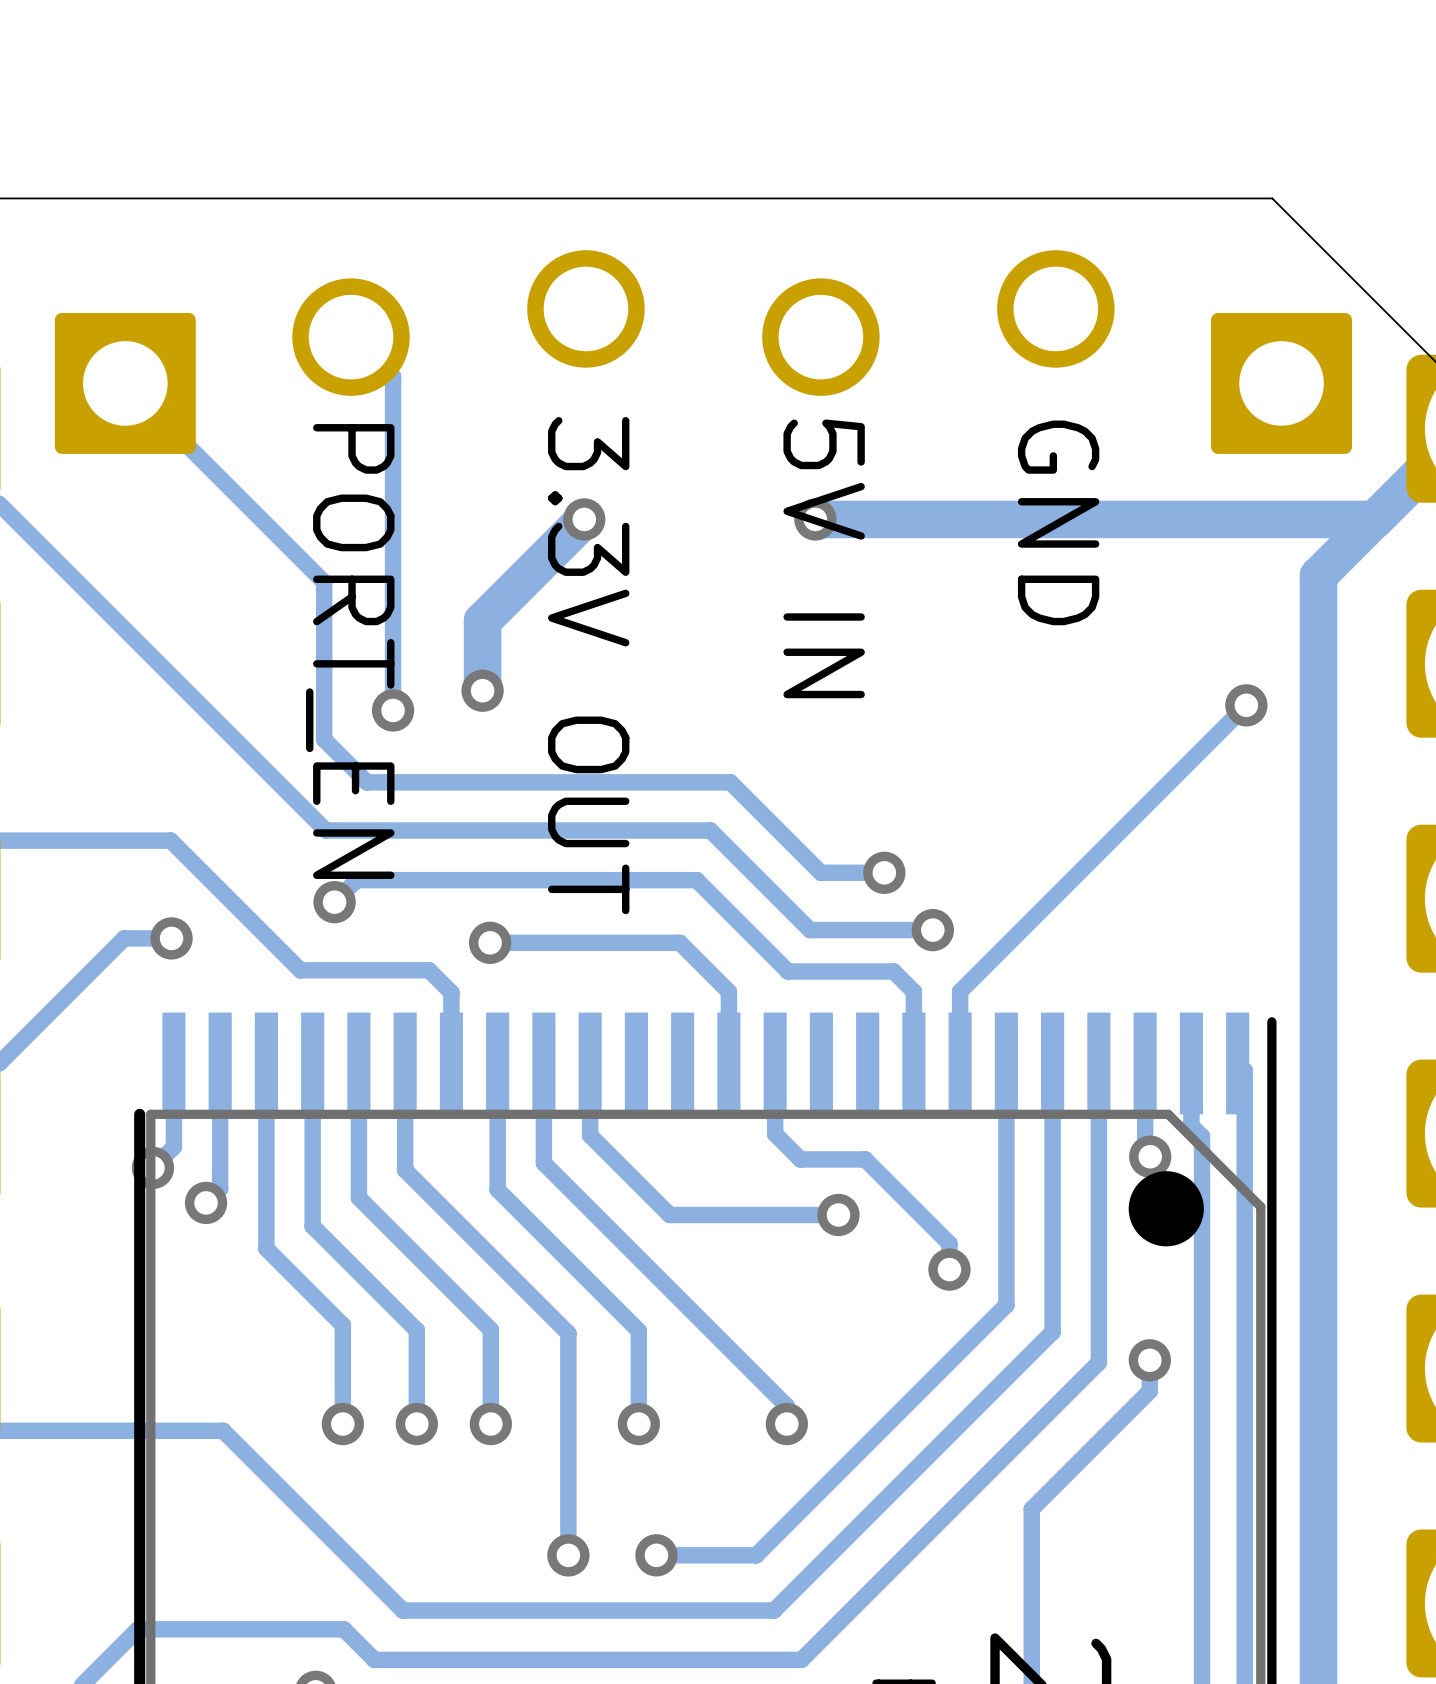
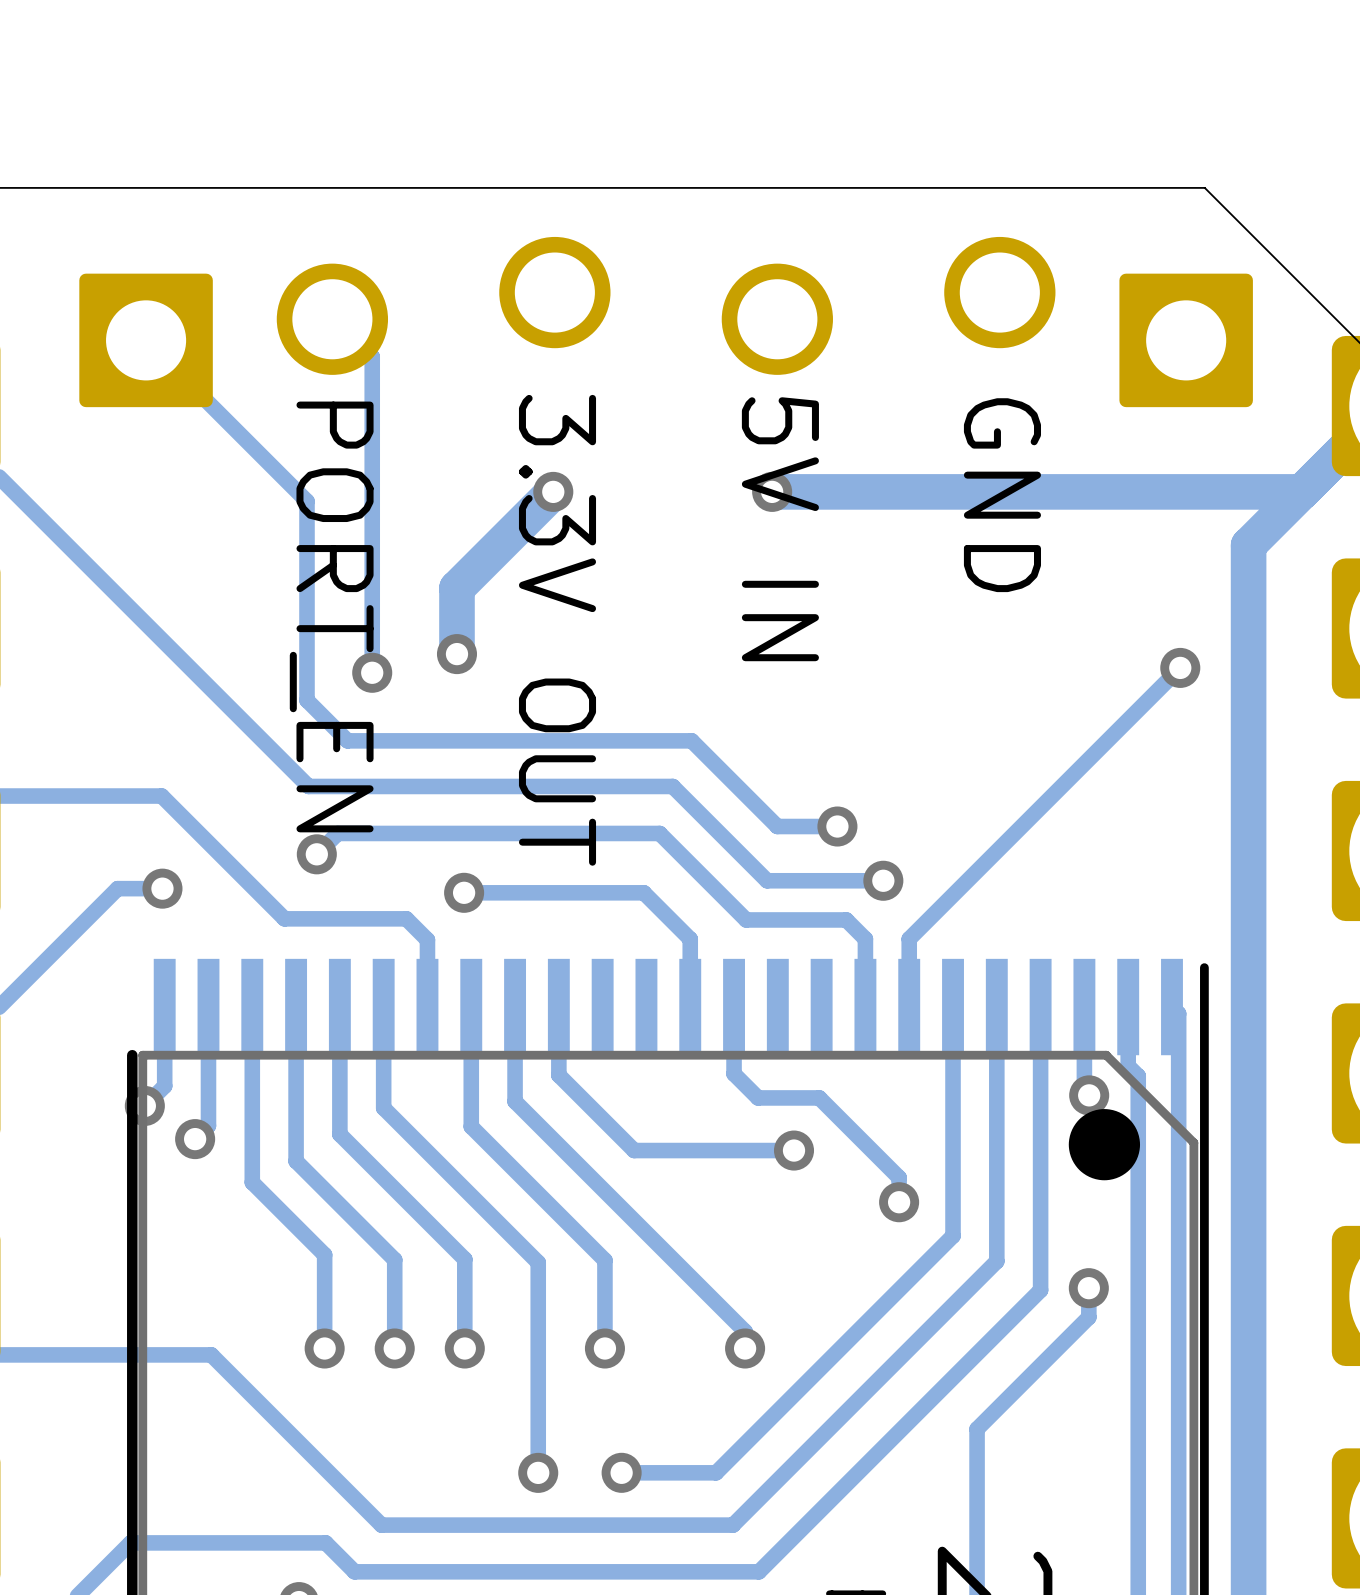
track: (125, 383) (324, 582) -> (146, 340) (306, 501) (306, 551)
part position: (125, 383) -> (146, 340)
part position: (1281, 383) -> (1186, 340)

